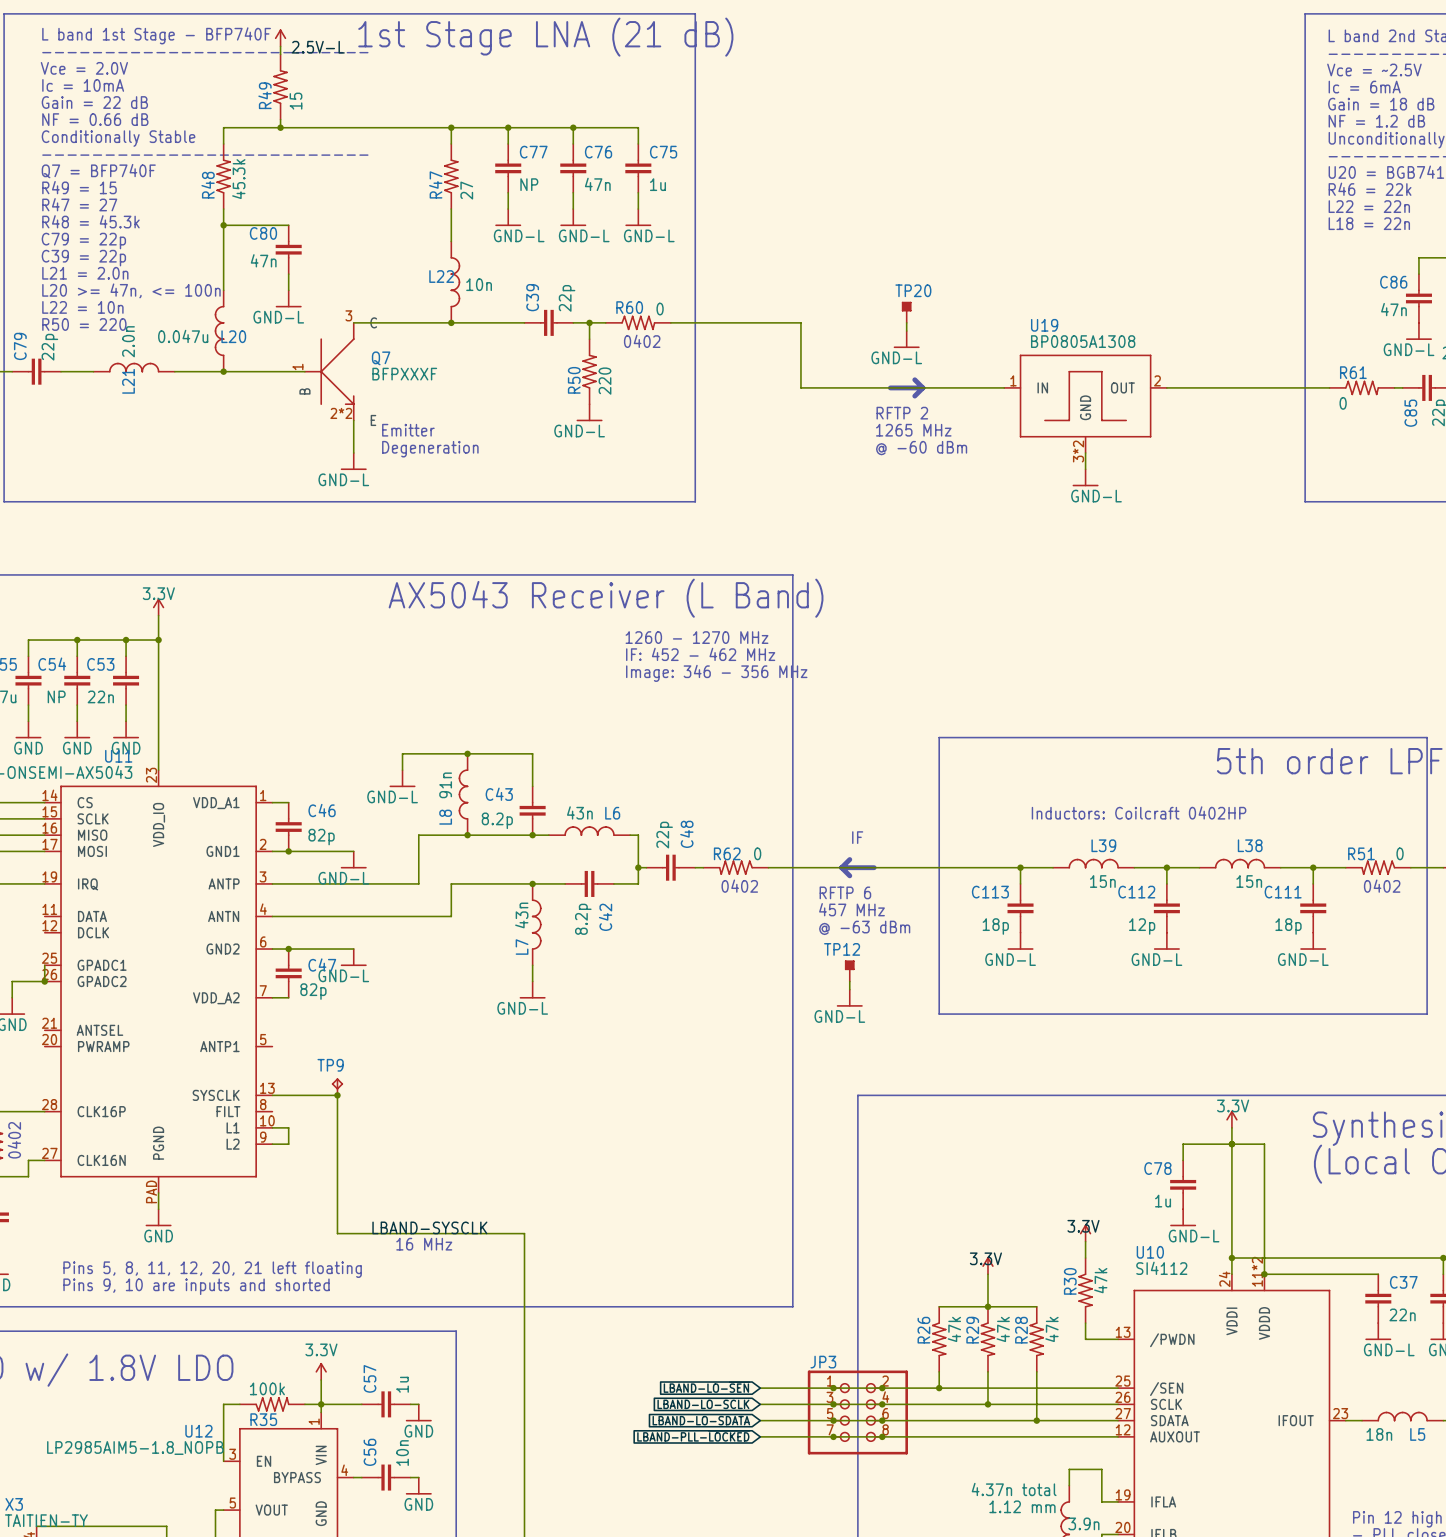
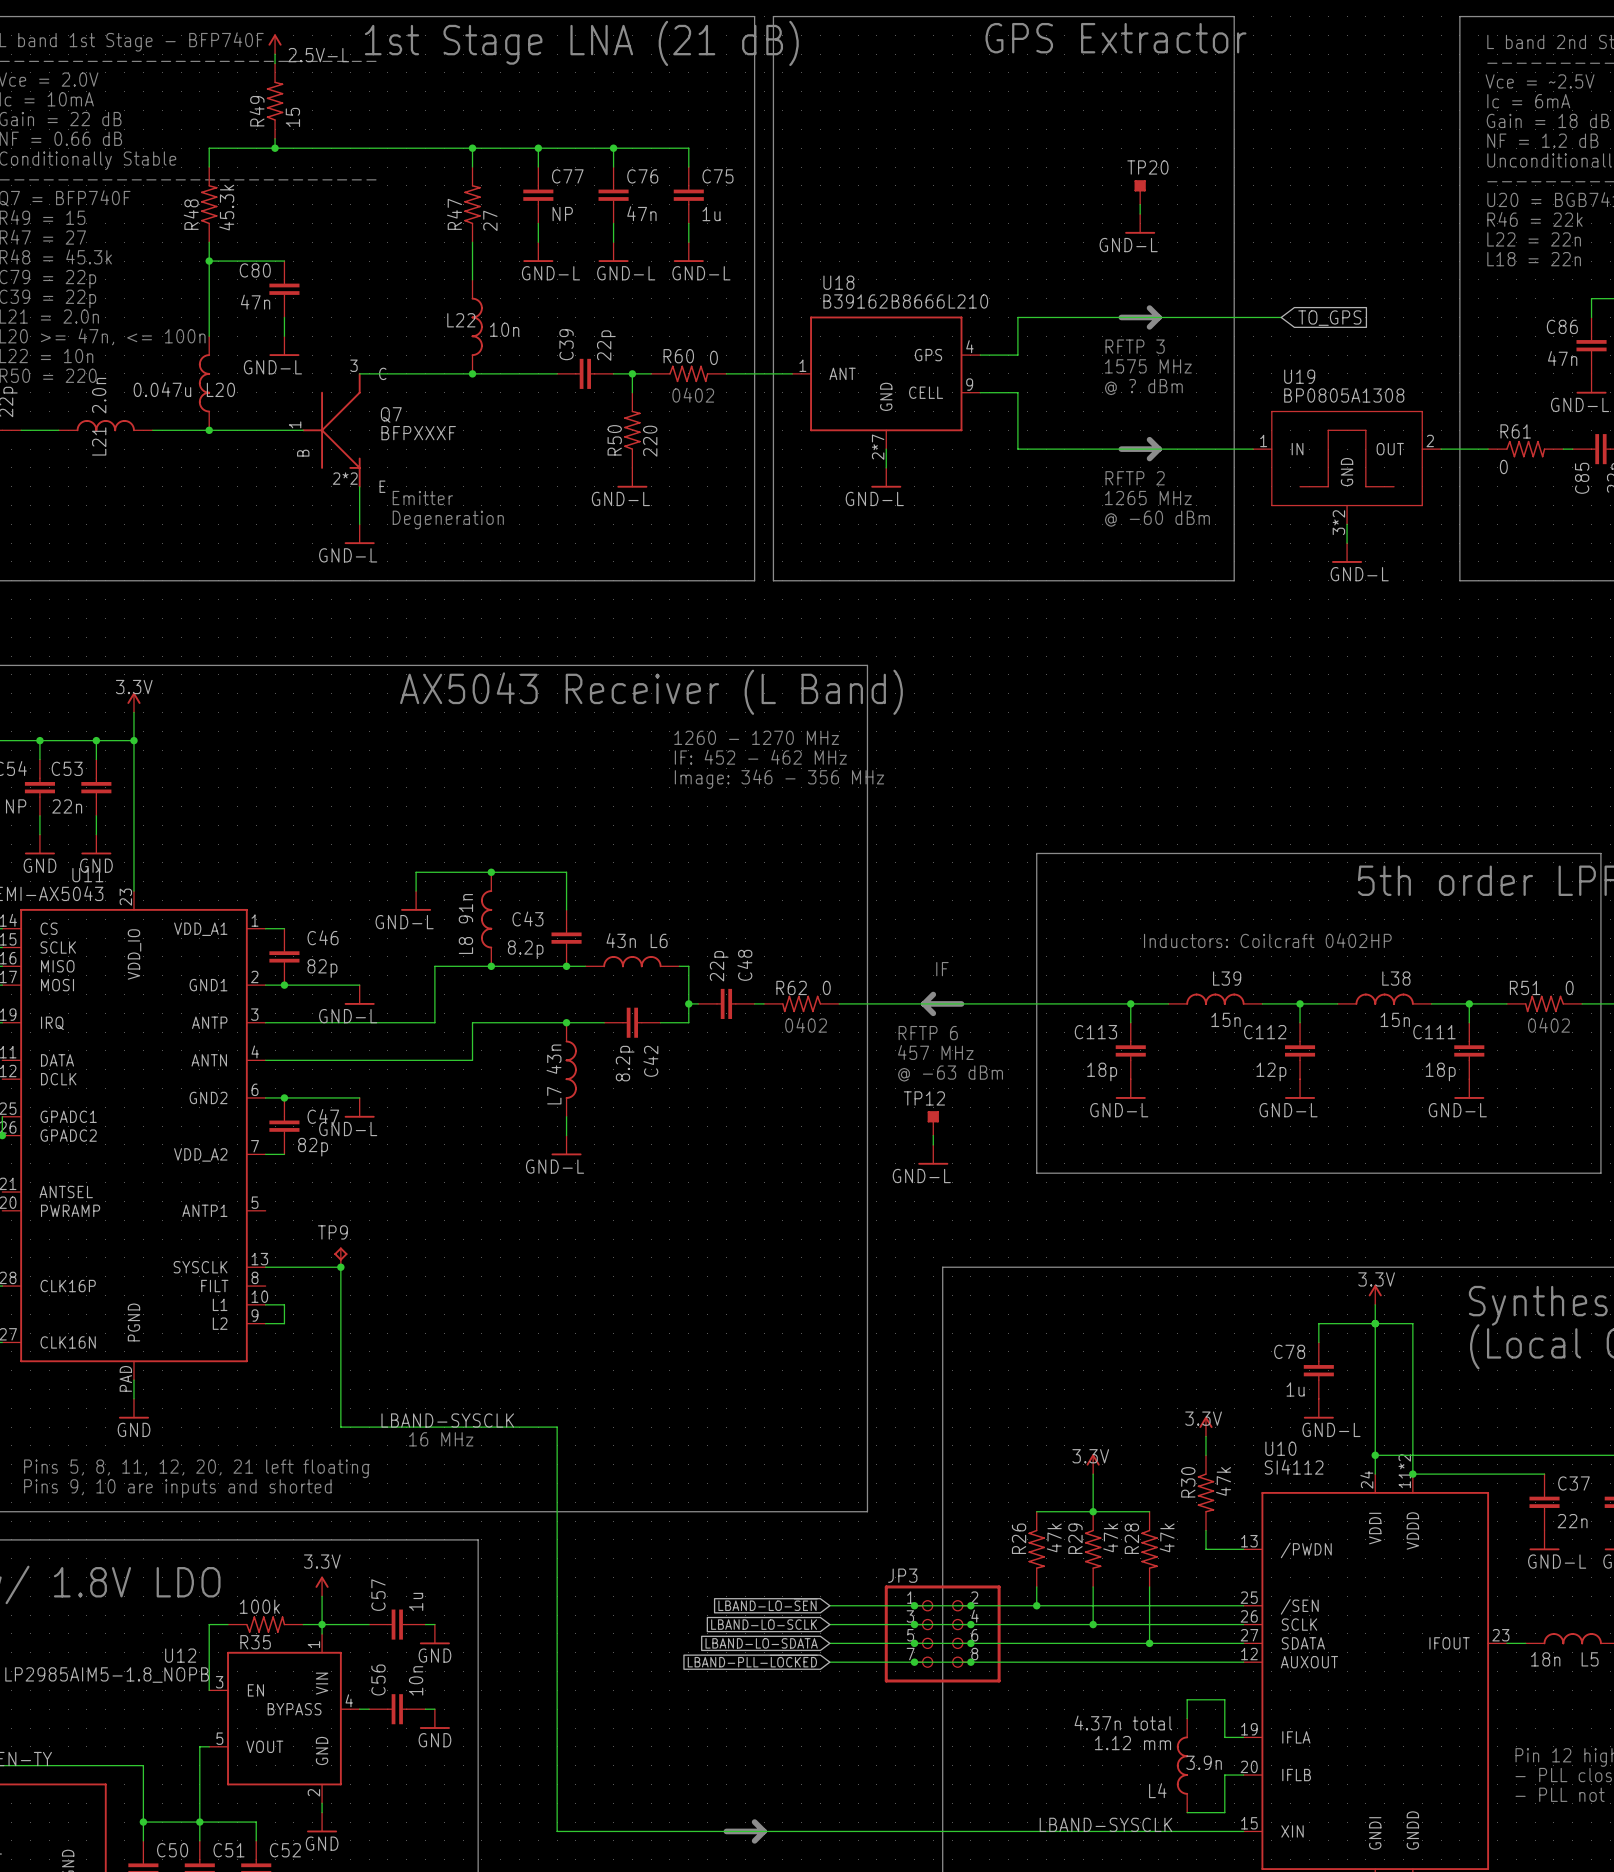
line: none -> (773, 16) (773, 580) (1234, 580) (1234, 16) (773, 16)
text: none -> GPS Extractor (1115, 38)
wire: none -> (1140, 204) (1140, 214)
power symbol: none -> GND-L (1140, 223)
line: none -> (1149, 308) (1158, 317)
line: none -> (1121, 317) (1158, 317)
line: none -> (1158, 317) (1149, 326)
wire: none -> (1281, 317) (1017, 317) (1017, 355) (980, 355)
global label: none -> TO_GPS (1329, 318)
text: none -> RFTP 3 (1135, 346)
TP20 position: (906, 312) -> (1140, 192)
text: none -> 1575 MHz (1148, 366)
wire: (727, 322) (800, 322) (800, 387) (922, 387) -> (980, 392) (1017, 392) (1017, 449)
wire: (906, 322) (906, 331) -> none
U18: none -> B39162B8666L210 (886, 382)
text: none -> @ ? dBm (1143, 387)
power symbol: GND-L (906, 339) -> none
line: (914, 379) (922, 387) -> (1149, 439) (1158, 449)
wire: none -> (886, 449) (886, 467)
line: (890, 387) (922, 387) -> (1121, 449) (1158, 449)
line: (922, 387) (914, 396) -> (1158, 449) (1149, 458)
wire: none -> (1111, 449) (1253, 449)
wire: (1166, 387) (1288, 387) -> none
U19 position: (1085, 403) -> (1347, 467)
power symbol: none -> GND-L (886, 477)
text position: RFTP 2 (902, 413) -> RFTP 2 (1135, 478)
text position: 1265 MHz (913, 430) -> 1265 MHz (1148, 498)
text position: @ -60 dBm (921, 448) -> @ -60 dBm (1157, 518)
wire: (1085, 452) (1085, 469) -> (1347, 524) (1347, 543)
power symbol position: GND-L (1085, 477) -> GND-L (1347, 553)

